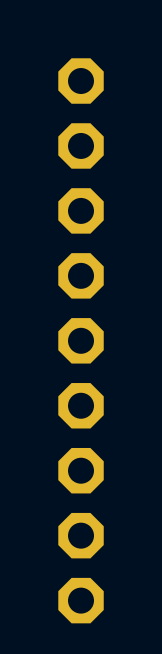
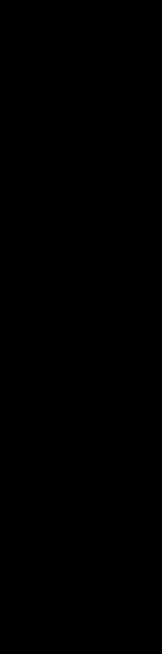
part: (81, 340) -> none

